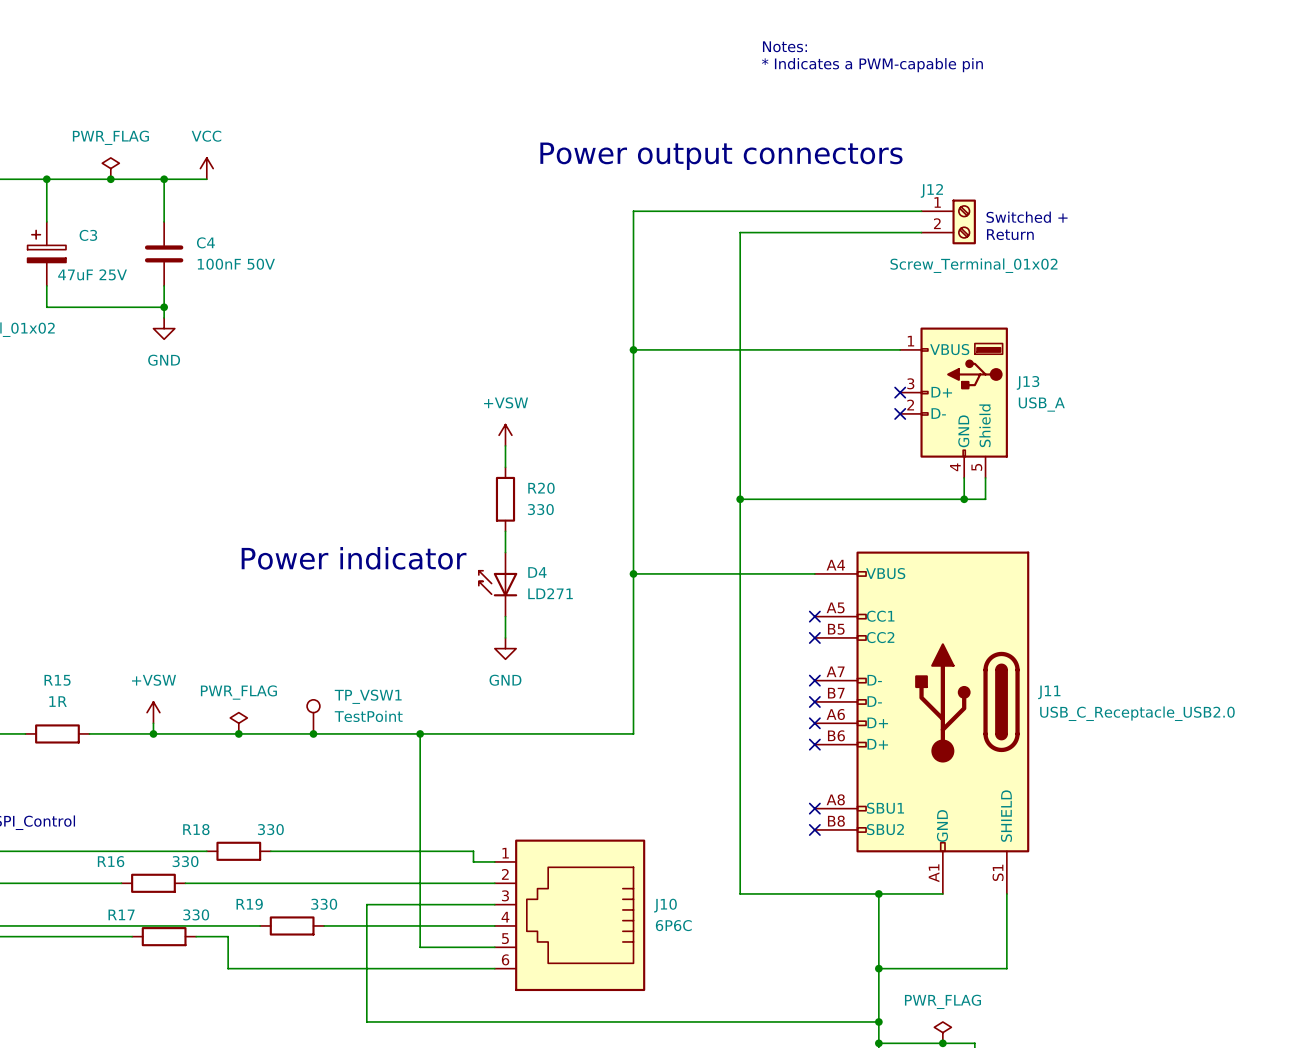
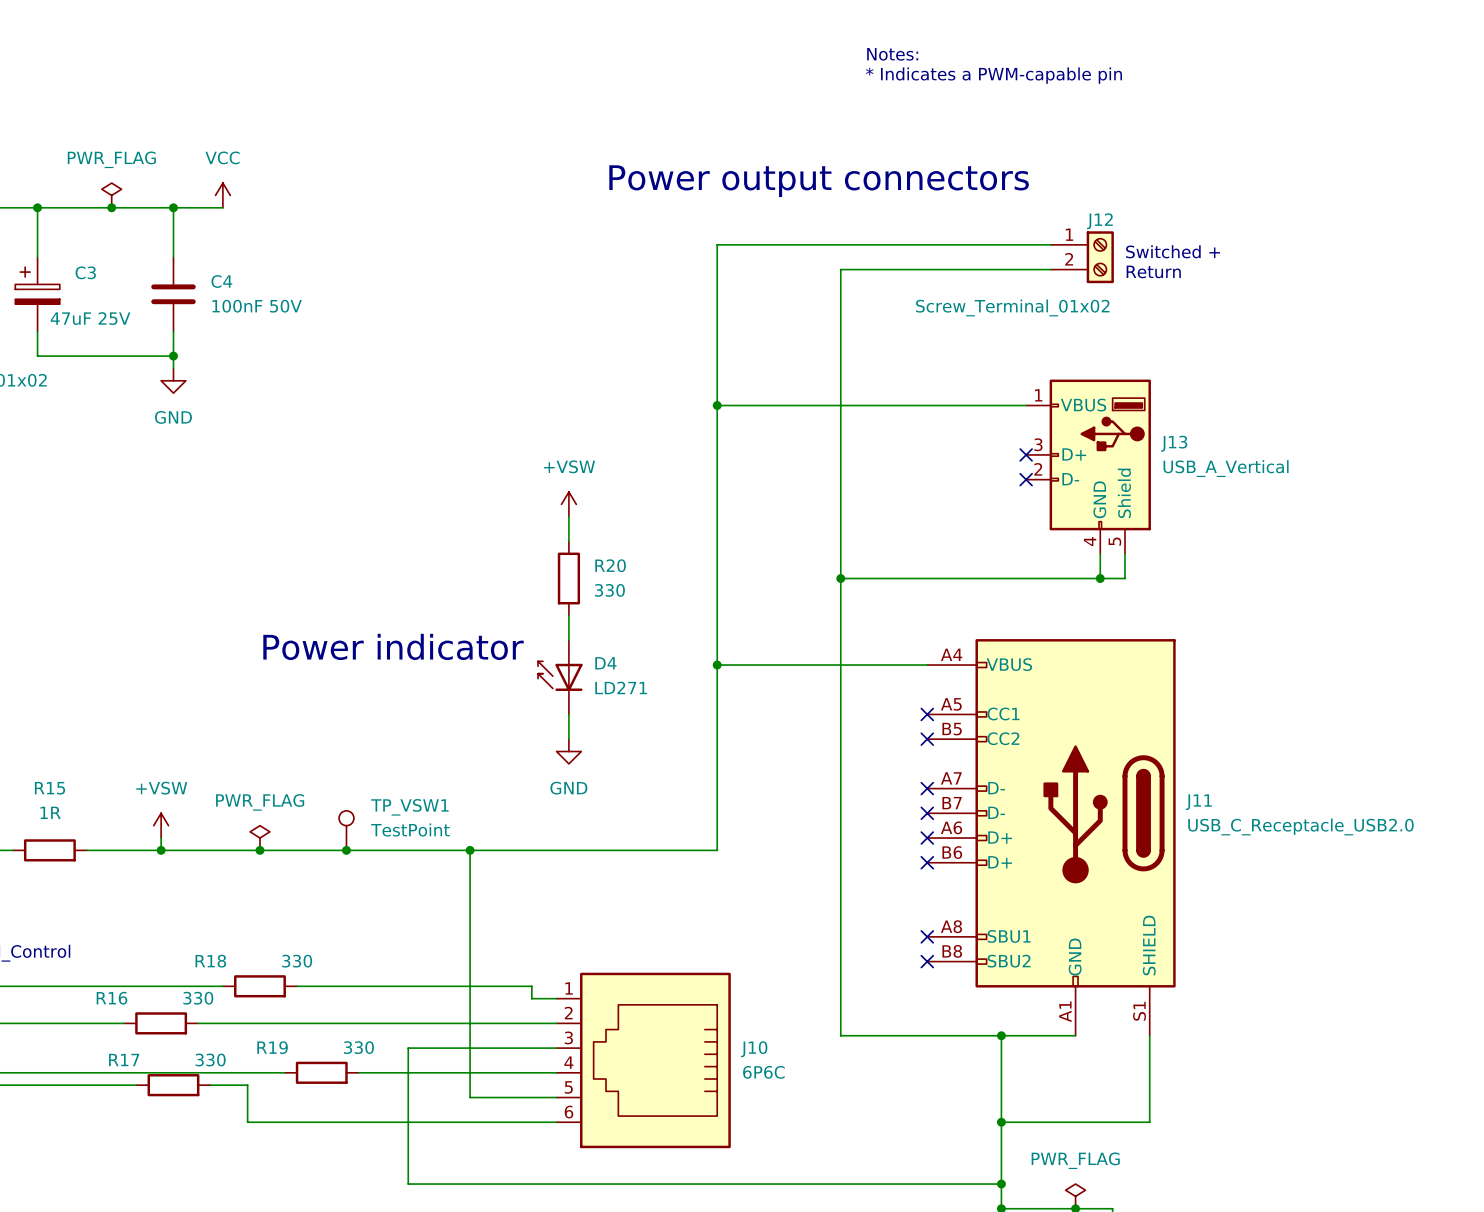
J12 name position: J12 (931, 190) -> J12 (1099, 221)
J12 value position: Screw_Terminal_01x02 (973, 265) -> Screw_Terminal_01x02 (1012, 307)
J13 value: USB_A (1041, 404) -> USB_A_Vertical (1226, 468)

